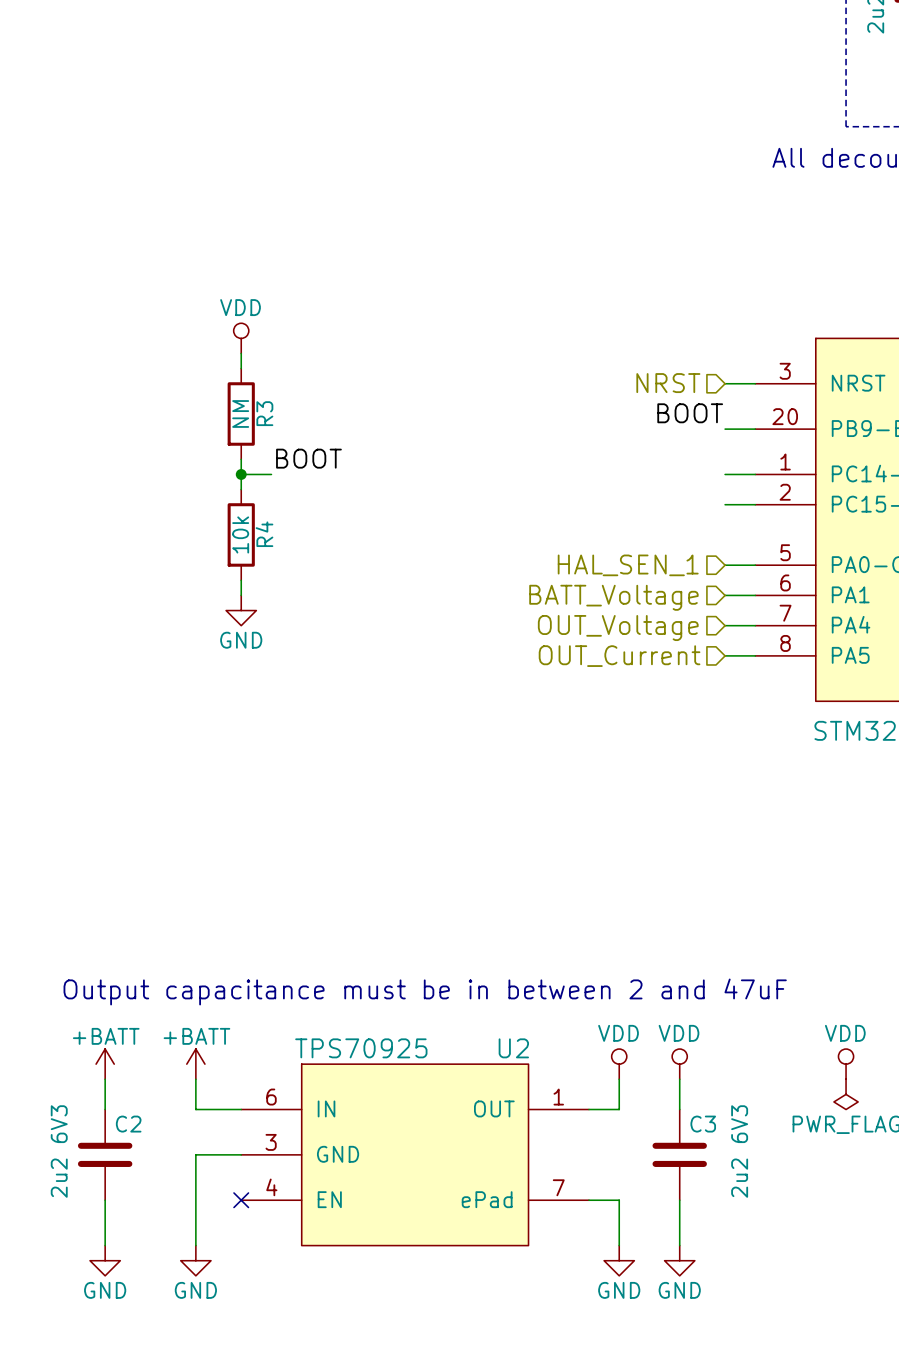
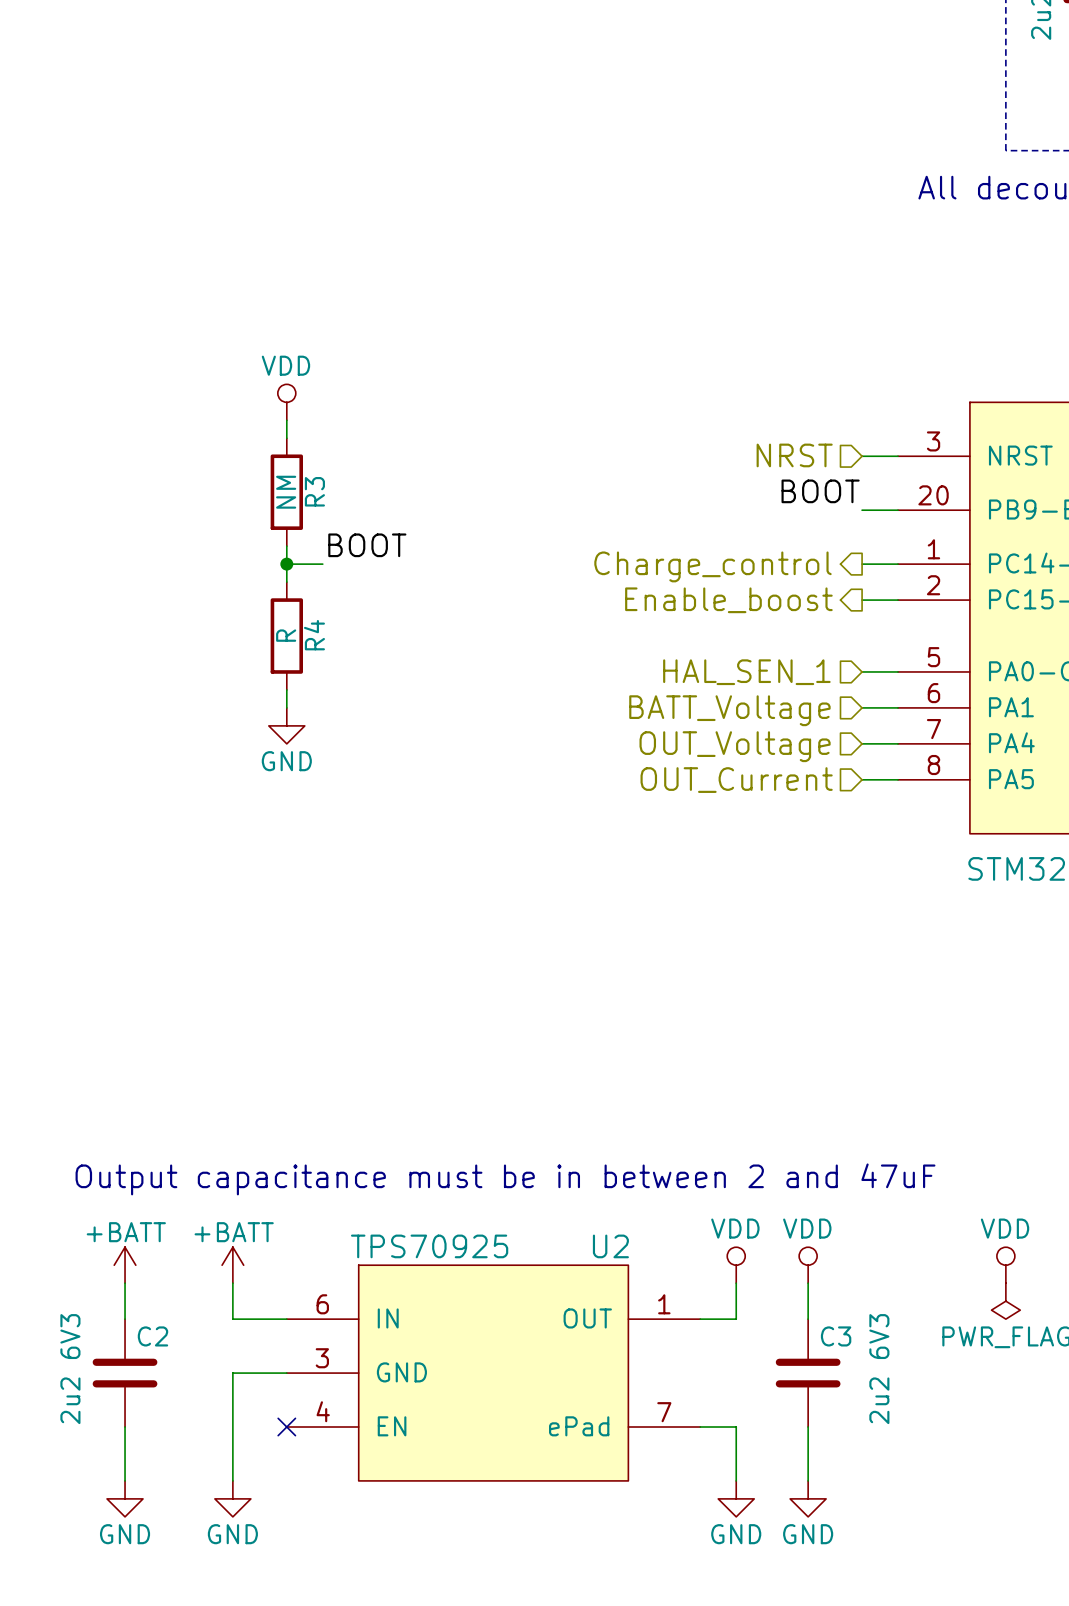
hierarchical label: none -> Charge_control (712, 566)
hierarchical label: none -> Enable_boost (728, 600)
R4 value: 10k (240, 534) -> R (286, 635)

